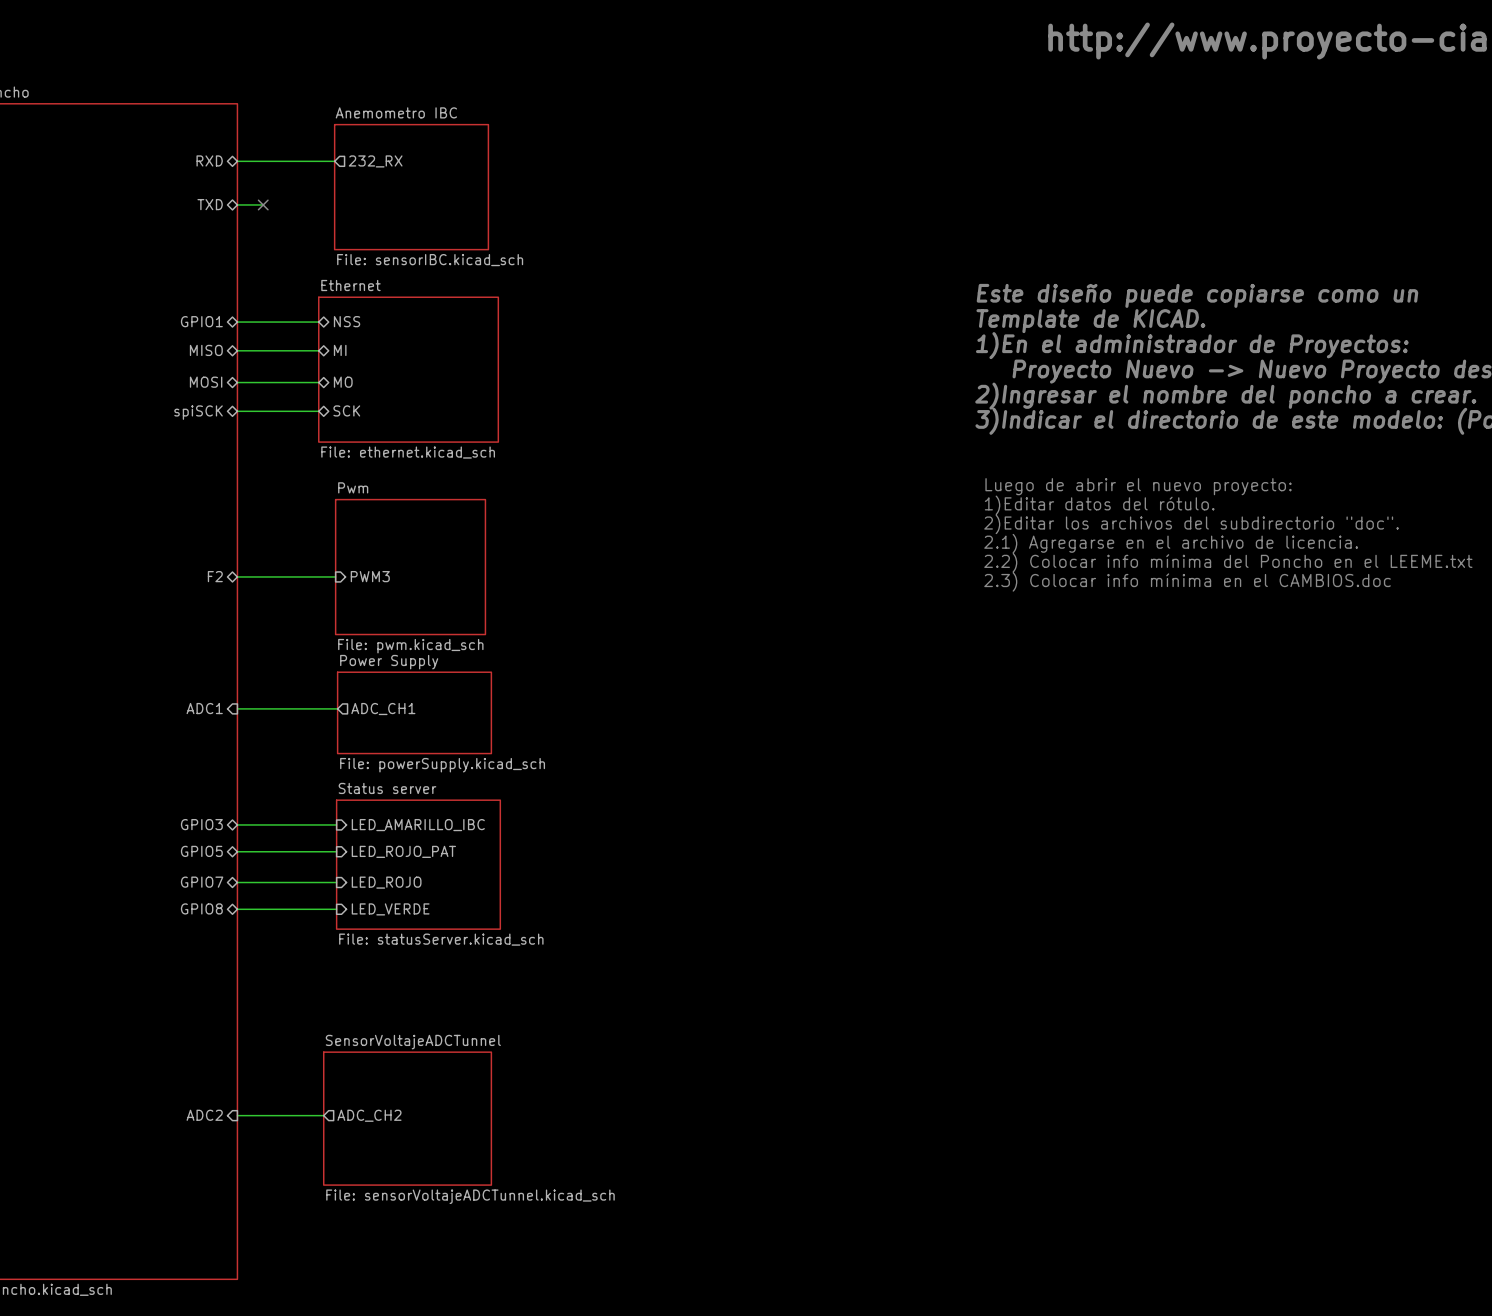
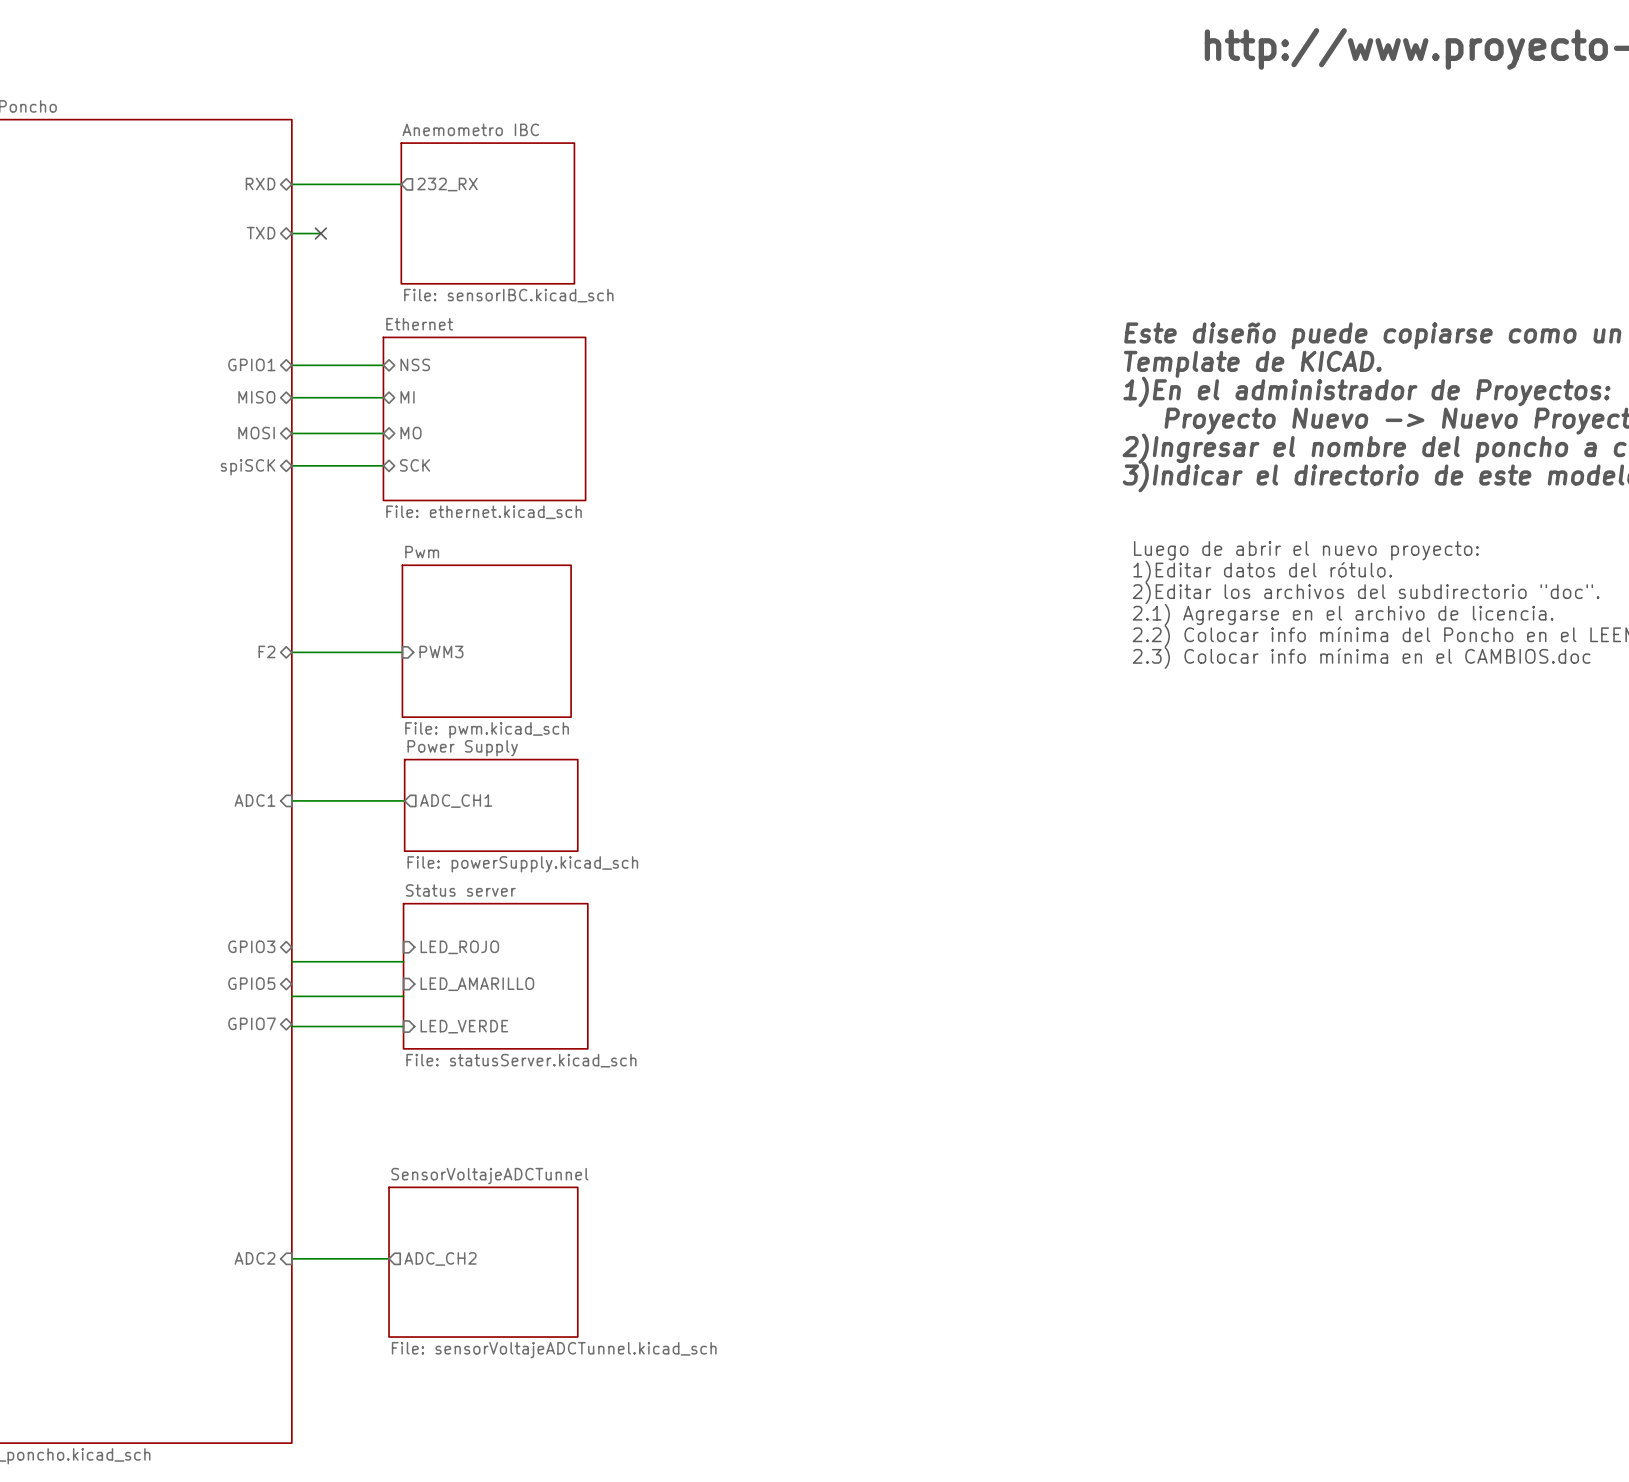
sheet pin position: GPIO3 (201, 824) -> GPIO3 (251, 946)
wire: (237, 824) (336, 824) -> none
sheet pin: LED_AMARILLO_IBC (418, 825) -> none
sheet pin position: GPIO5 (201, 851) -> GPIO5 (251, 983)
sheet pin: LED_ROJO_PAT (403, 851) -> none
sheet pin: none -> LED_AMARILLO (477, 984)
sheet pin position: GPIO7 (202, 882) -> GPIO7 (252, 1023)
sheet pin position: LED_ROJO (386, 882) -> LED_ROJO (459, 947)
sheet pin: GPIO8 (201, 908) -> none

